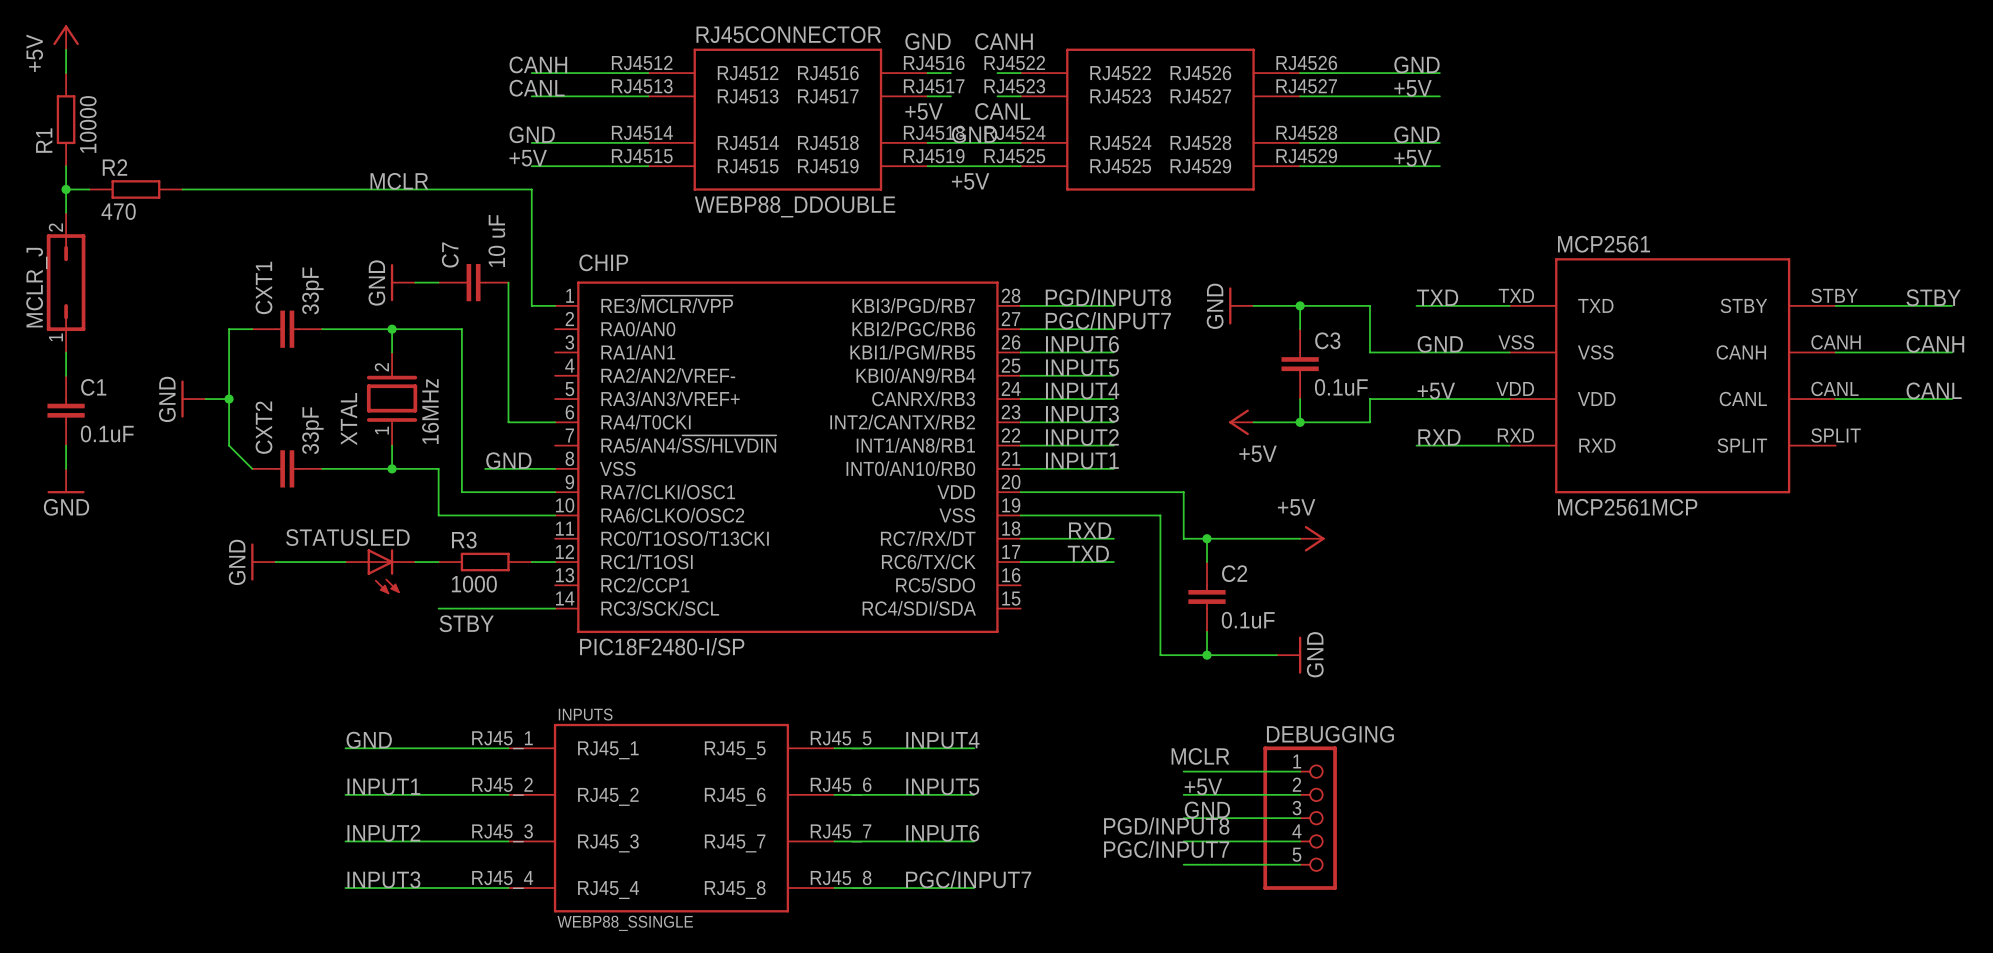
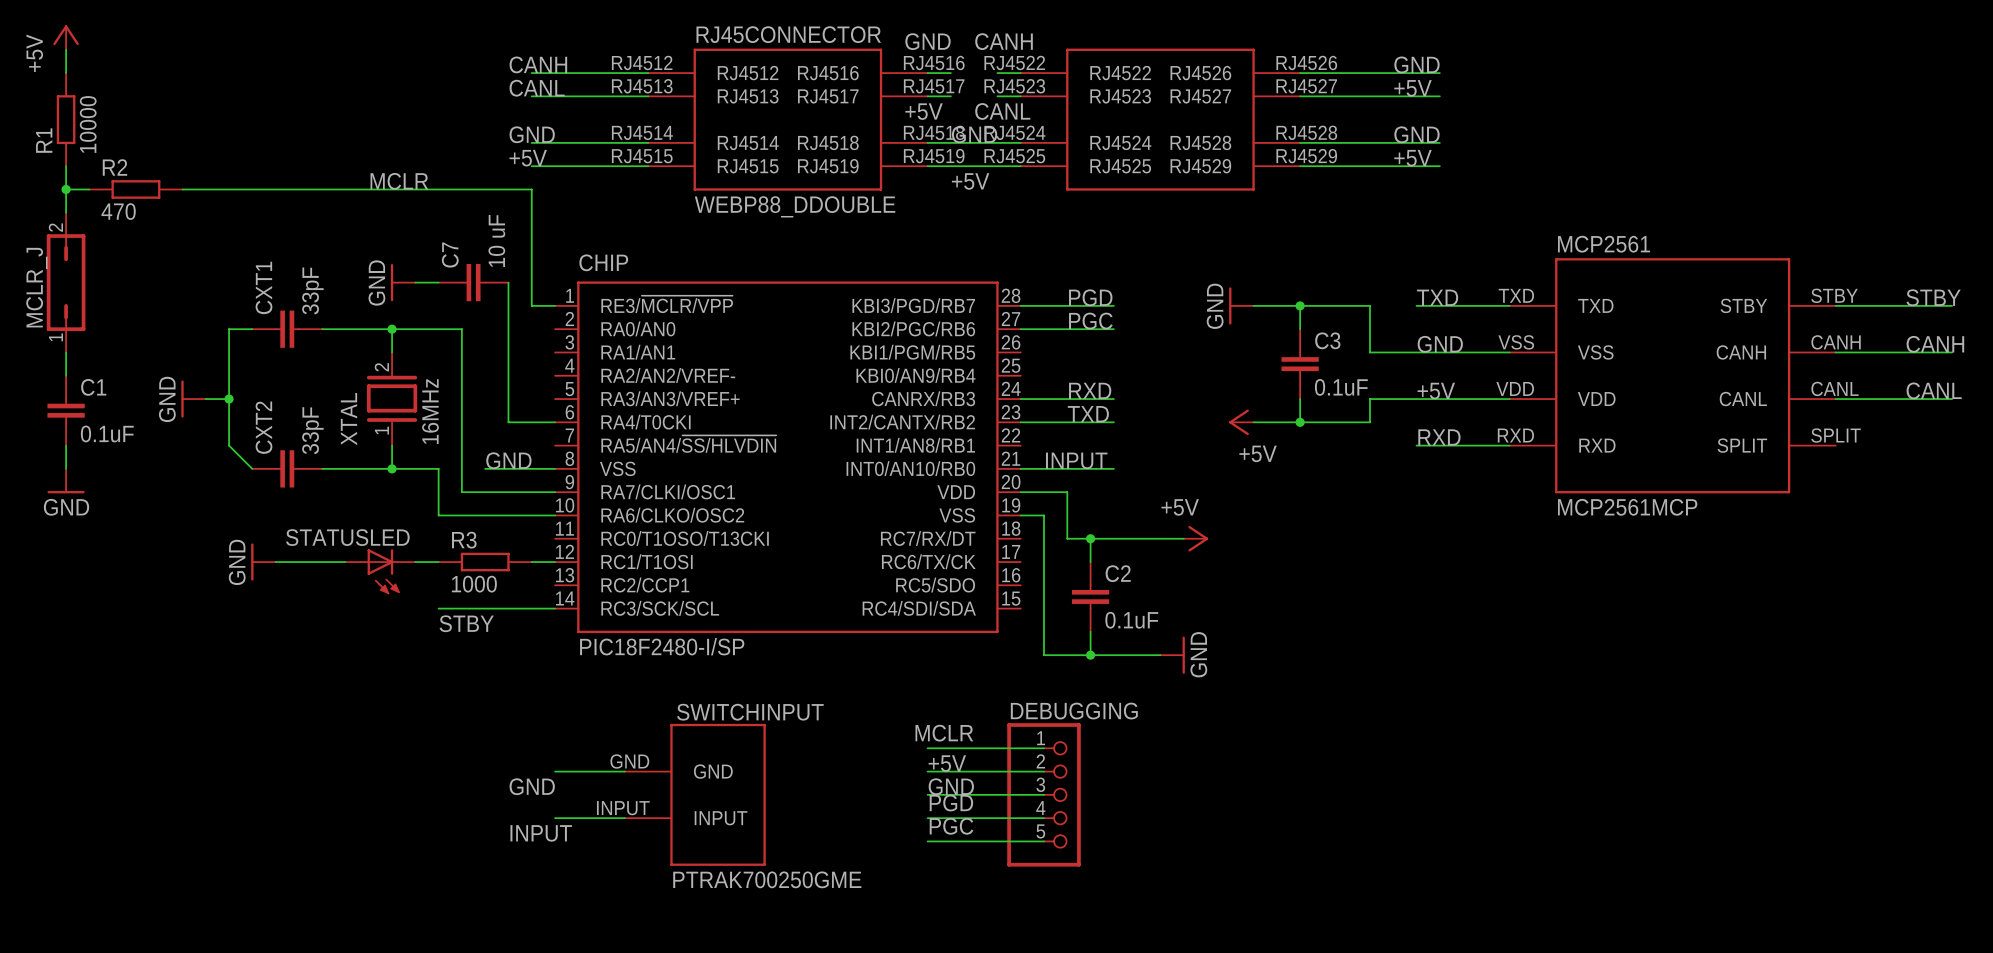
label: none -> PGD (1090, 297)
label: PGD/INPUT8 (1108, 297) -> none
label: PGC/INPUT7 (1108, 320) -> none
label: none -> PGC (1090, 321)
label: INPUT6 (1082, 344) -> none
wire: (1020, 352) (1113, 352) -> none
label: INPUT5 (1082, 367) -> none
wire: (1020, 375) (1113, 375) -> none
label: INPUT4 (1082, 391) -> none
label: INPUT3 (1082, 414) -> none
label: INPUT2 (1082, 437) -> none
wire: (1020, 445) (1113, 445) -> none
label: INPUT1 (1082, 460) -> INPUT (1076, 460)
wire: (1067, 492) (1183, 492) (1183, 538) (1300, 538) -> none
wire: (1044, 515) (1160, 515) (1160, 655) (1276, 655) -> (1044, 515) (1044, 655) (1160, 655)
label position: RXD (1090, 530) -> RXD (1090, 390)
wire: (1020, 538) (1067, 538) -> (1067, 492) (1067, 538)
junction: none -> (1090, 538)
wire: none -> (1113, 538) (1183, 538)
wire: (1206, 538) (1206, 562) -> (1090, 538) (1090, 562)
junction: (1206, 538) -> none
power symbol position: +5V (1312, 538) -> +5V (1195, 538)
label position: TXD (1088, 553) -> TXD (1088, 414)
wire: (1020, 562) (1113, 562) -> none
C2 position: (1206, 596) -> (1090, 596)
wire: (1206, 631) (1206, 655) -> (1090, 631) (1090, 655)
junction: none -> (1090, 655)
junction: (1206, 655) -> none
power symbol position: GND (1289, 655) -> GND (1172, 655)
label: none -> MCLR (944, 733)
label position: GND (369, 740) -> GND (532, 786)
label: INPUT4 (942, 740) -> none
wire: (345, 748) (508, 748) -> none
wire: (834, 748) (927, 748) -> none
wire: none -> (974, 748) (1044, 748)
label: MCLR (1200, 756) -> none
label: none -> +5V (947, 763)
wire: none -> (555, 771) (624, 771)
wire: none -> (927, 771) (1044, 771)
wire: (1183, 771) (1300, 771) -> none
label: INPUT1 (383, 786) -> none
label: INPUT5 (942, 786) -> none
label: none -> GND (951, 786)
label: +5V (1203, 786) -> none
wire: (345, 794) (508, 794) -> none
SWITCHINPUT: none -> PTRAK700250GME (695, 794)
wire: (834, 794) (927, 794) -> none
wire: none -> (974, 794) (1044, 794)
DEBUGGING: none -> (1044, 794)
wire: (1183, 794) (1300, 794) -> none
label: none -> PGD (951, 803)
label: GND (1207, 810) -> none
wire: none -> (555, 818) (624, 818)
INPUTS: WEBP88_SSINGLE (671, 818) -> none
wire: none -> (927, 818) (1044, 818)
wire: (1183, 818) (1300, 818) -> none
DEBUGGING: (1300, 818) -> none
label: PGD/INPUT8 (1166, 825) -> none
label: none -> PGC (951, 826)
label: INPUT2 (383, 833) -> none
label: none -> INPUT (541, 833)
label: INPUT6 (942, 833) -> none
wire: (345, 841) (508, 841) -> none
wire: (834, 841) (927, 841) -> none
wire: none -> (974, 841) (1044, 841)
wire: (1183, 841) (1300, 841) -> none
label: PGC/INPUT7 (1166, 849) -> none
wire: (1183, 864) (1300, 864) -> none
label: INPUT3 (383, 879) -> none
label: PGC/INPUT7 (968, 879) -> none
wire: (345, 888) (508, 888) -> none
wire: (834, 888) (974, 888) -> none

